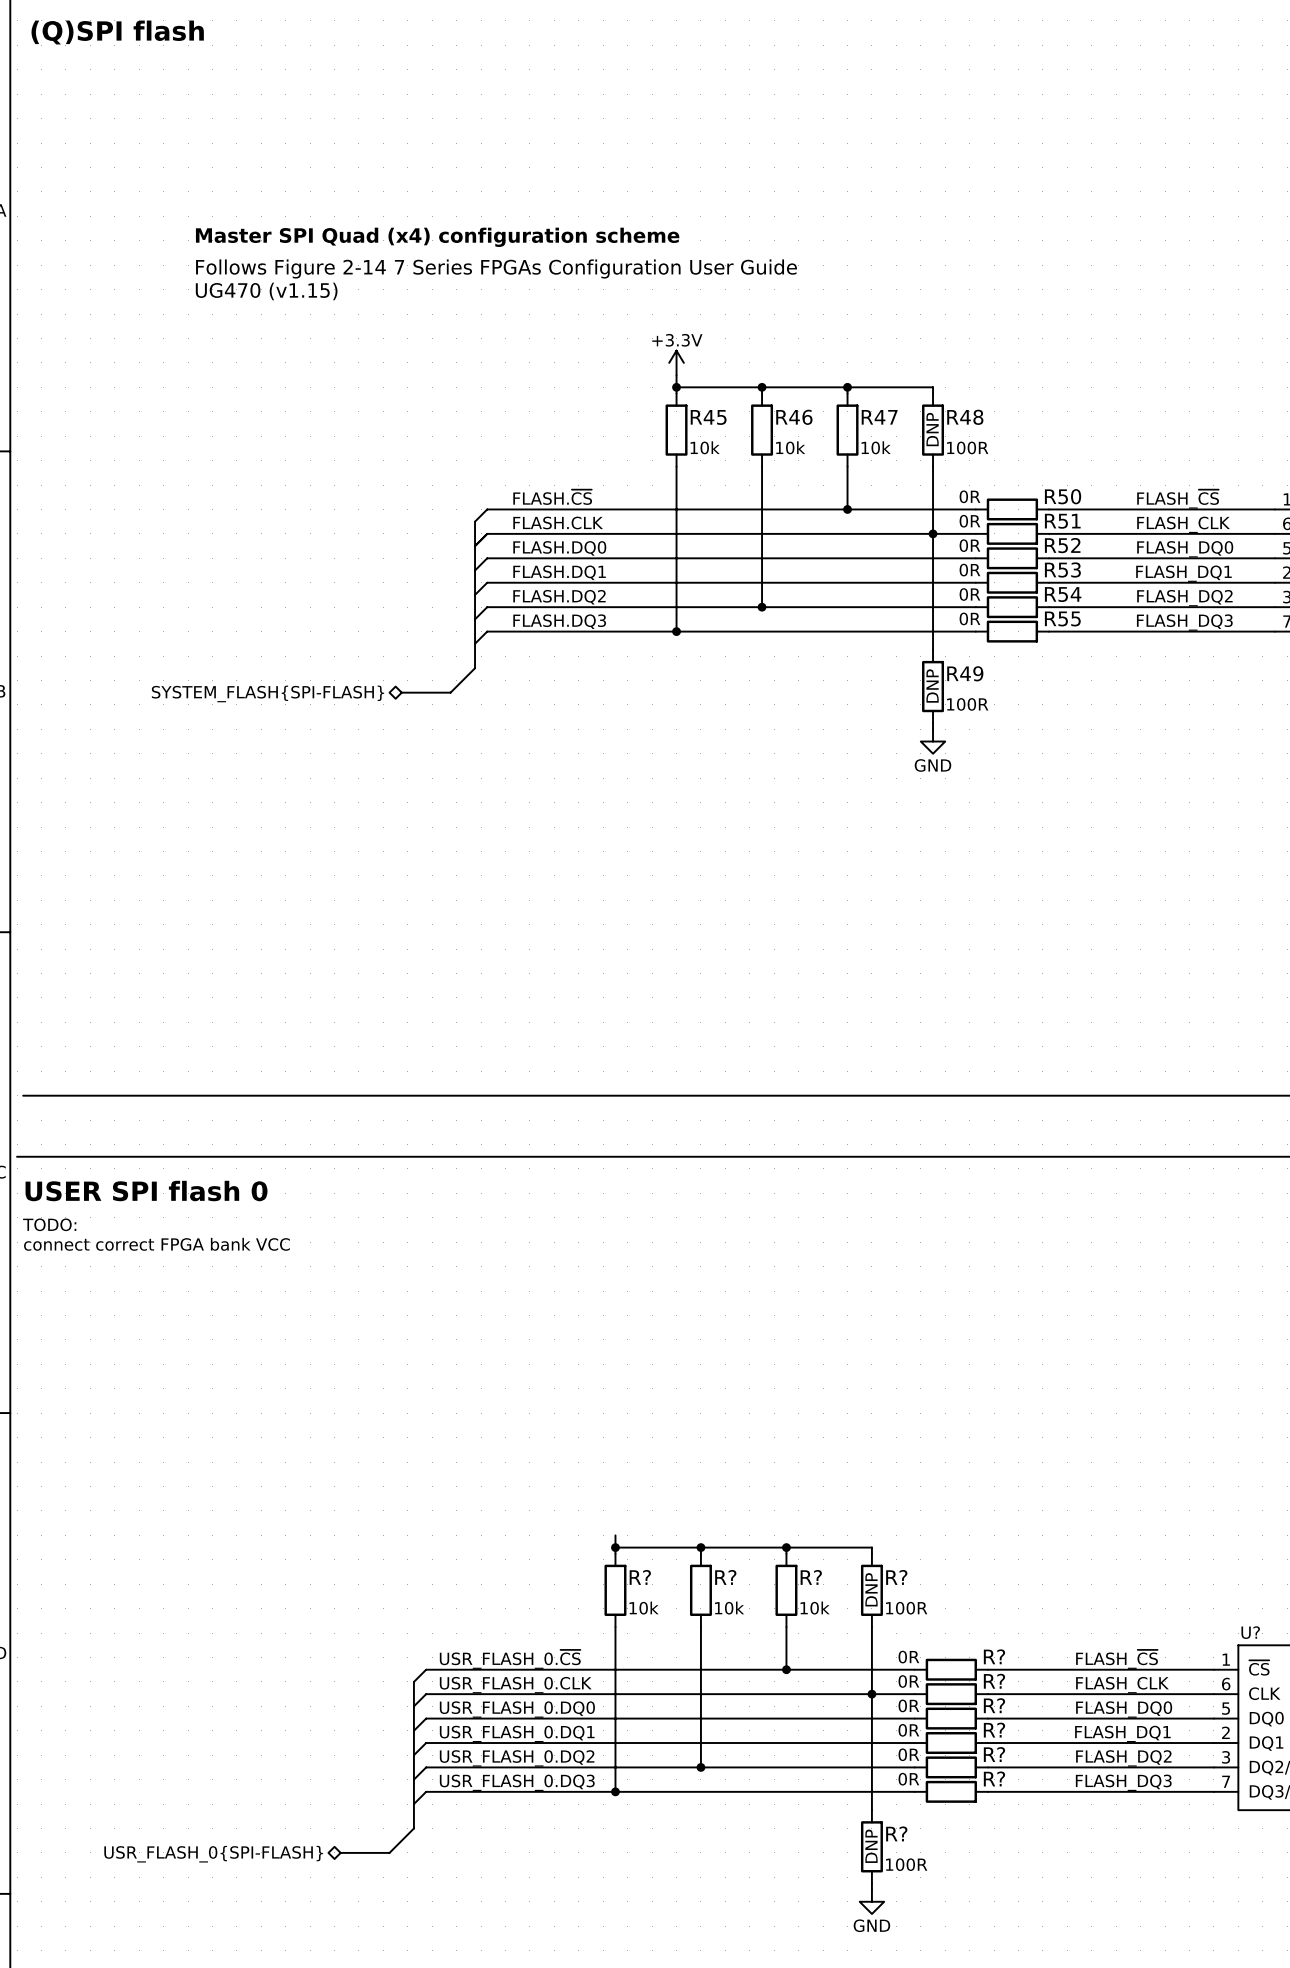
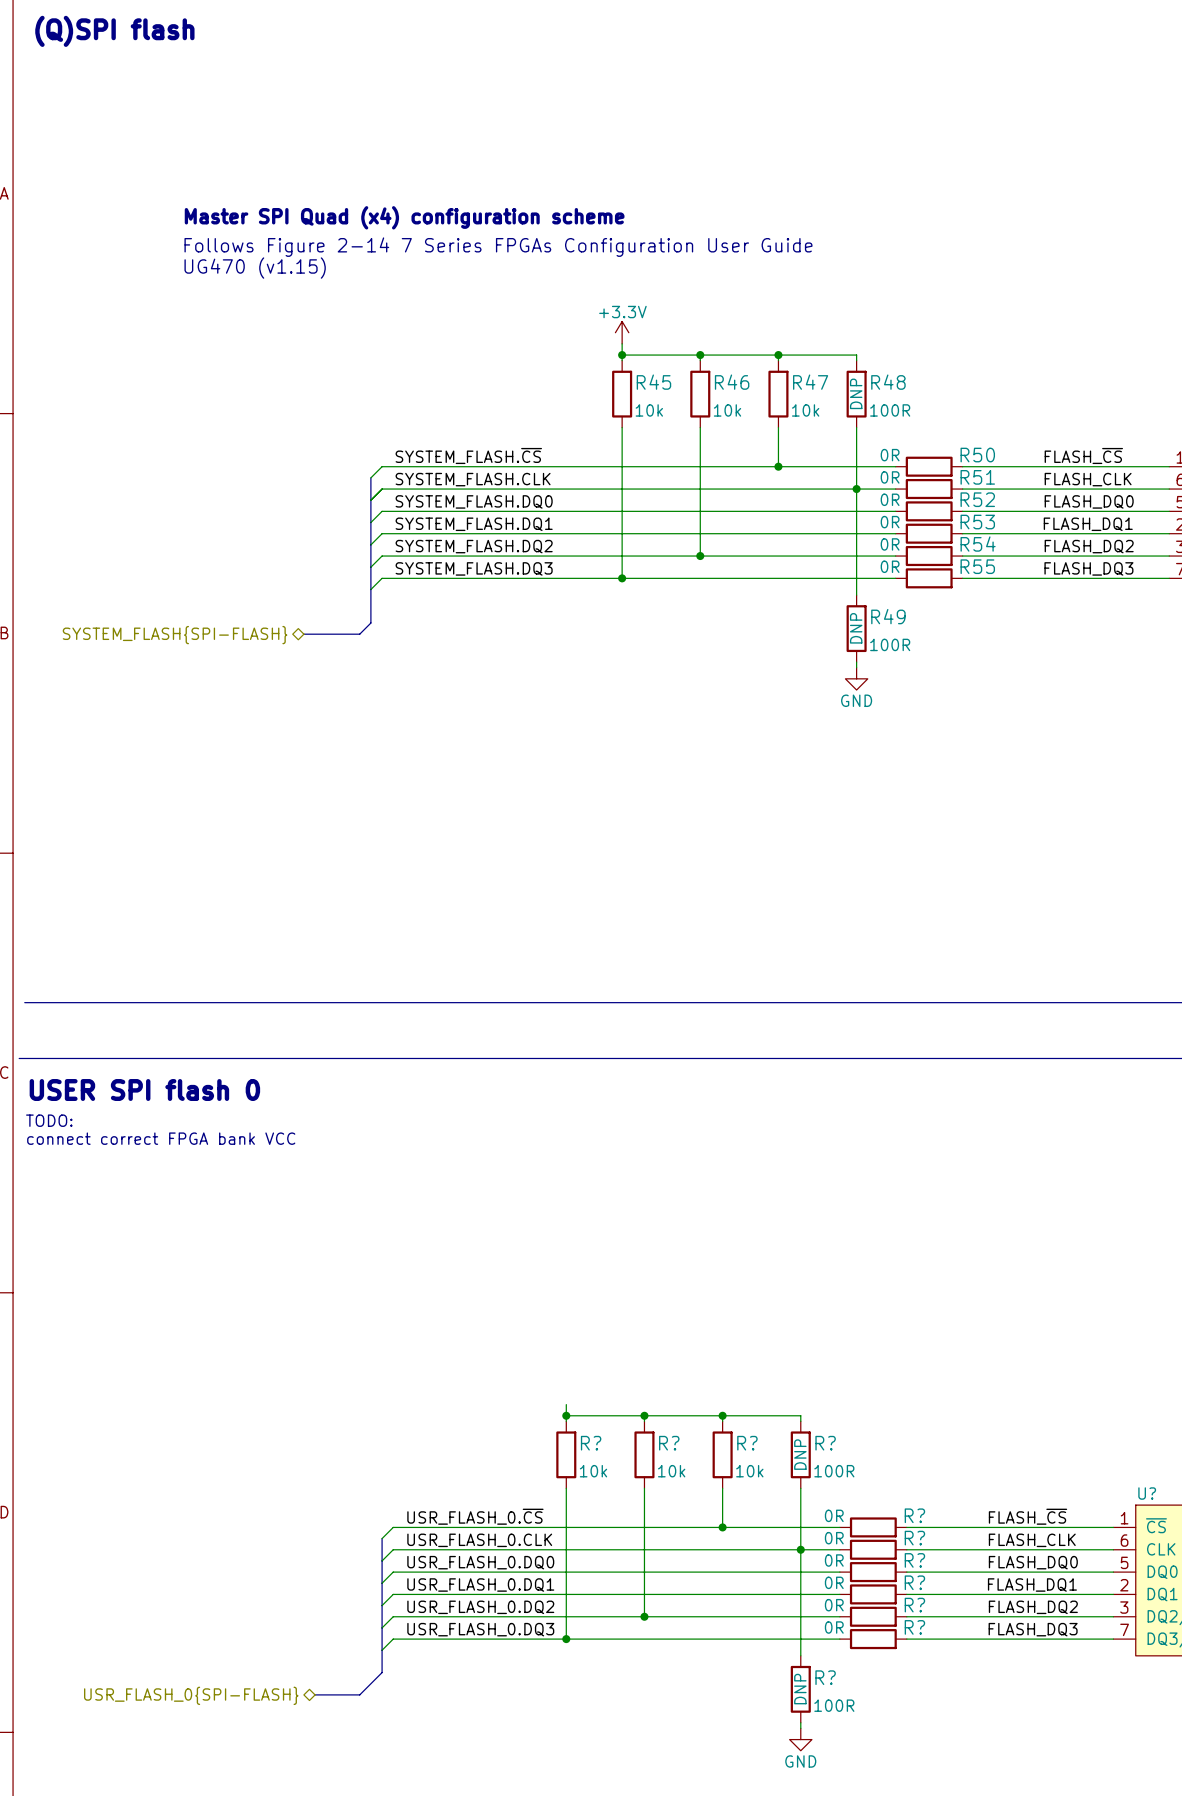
label: FLASH.~{CS} (552, 497) -> SYSTEM_FLASH.~{CS} (468, 455)
wire: (487, 509) (475, 521) -> (449, 466) (382, 466) (370, 477)
bus: none -> (370, 477) (370, 623) (359, 634) (303, 634)
bus: (475, 521) (475, 668) (450, 692) (401, 692) -> none
label: FLASH.CLK (558, 523) -> SYSTEM_FLASH.CLK (473, 479)
wire: (487, 533) (475, 546) -> (449, 489) (382, 489) (370, 500)
label: FLASH.DQ0 (559, 548) -> none
label: none -> SYSTEM_FLASH.DQ0 (474, 501)
wire: (487, 558) (475, 570) -> (449, 511) (382, 511) (370, 522)
label: FLASH.DQ1 (559, 572) -> none
label: none -> SYSTEM_FLASH.DQ1 (474, 524)
wire: (487, 582) (475, 594) -> (449, 533) (382, 533) (370, 544)
label: FLASH.DQ2 (559, 597) -> none
label: none -> SYSTEM_FLASH.DQ2 (474, 546)
wire: (487, 607) (475, 619) -> (449, 556) (382, 556) (370, 567)
label: FLASH.DQ3 (559, 621) -> none
label: none -> SYSTEM_FLASH.DQ3 (474, 568)
wire: (487, 631) (475, 643) -> (449, 578) (382, 578) (370, 589)
hierarchical label position: SYSTEM_FLASH{SPI-FLASH} (267, 693) -> SYSTEM_FLASH{SPI-FLASH} (175, 635)

